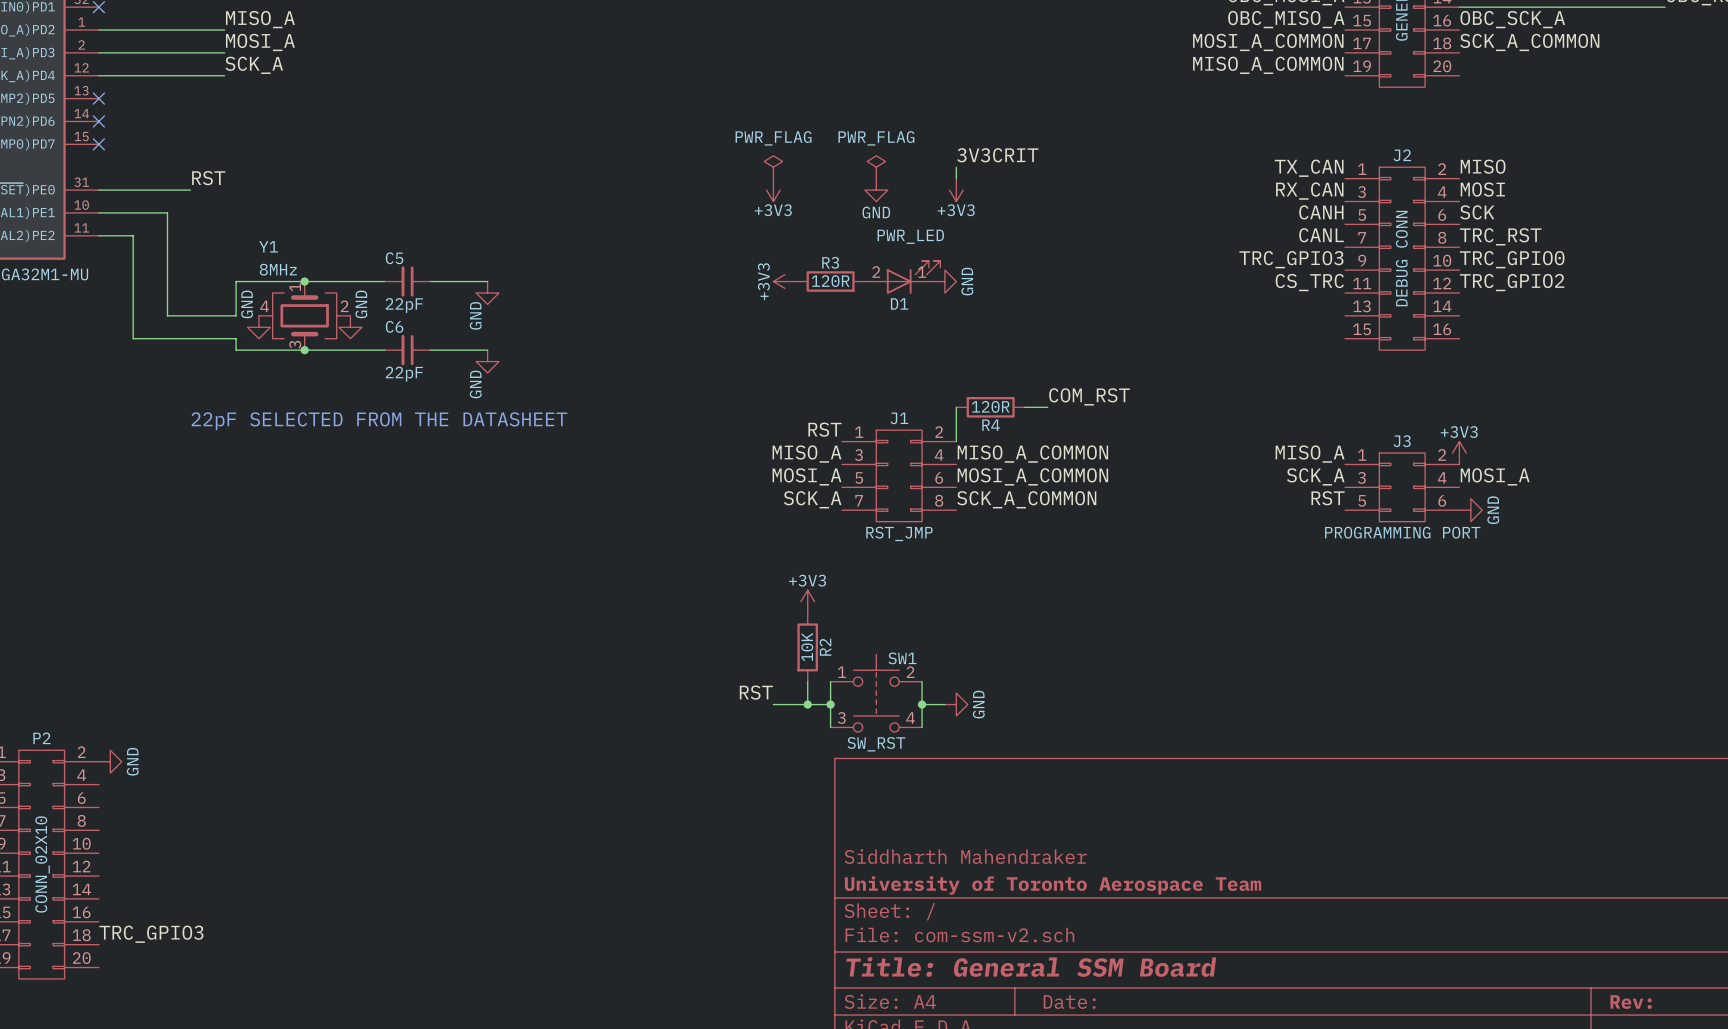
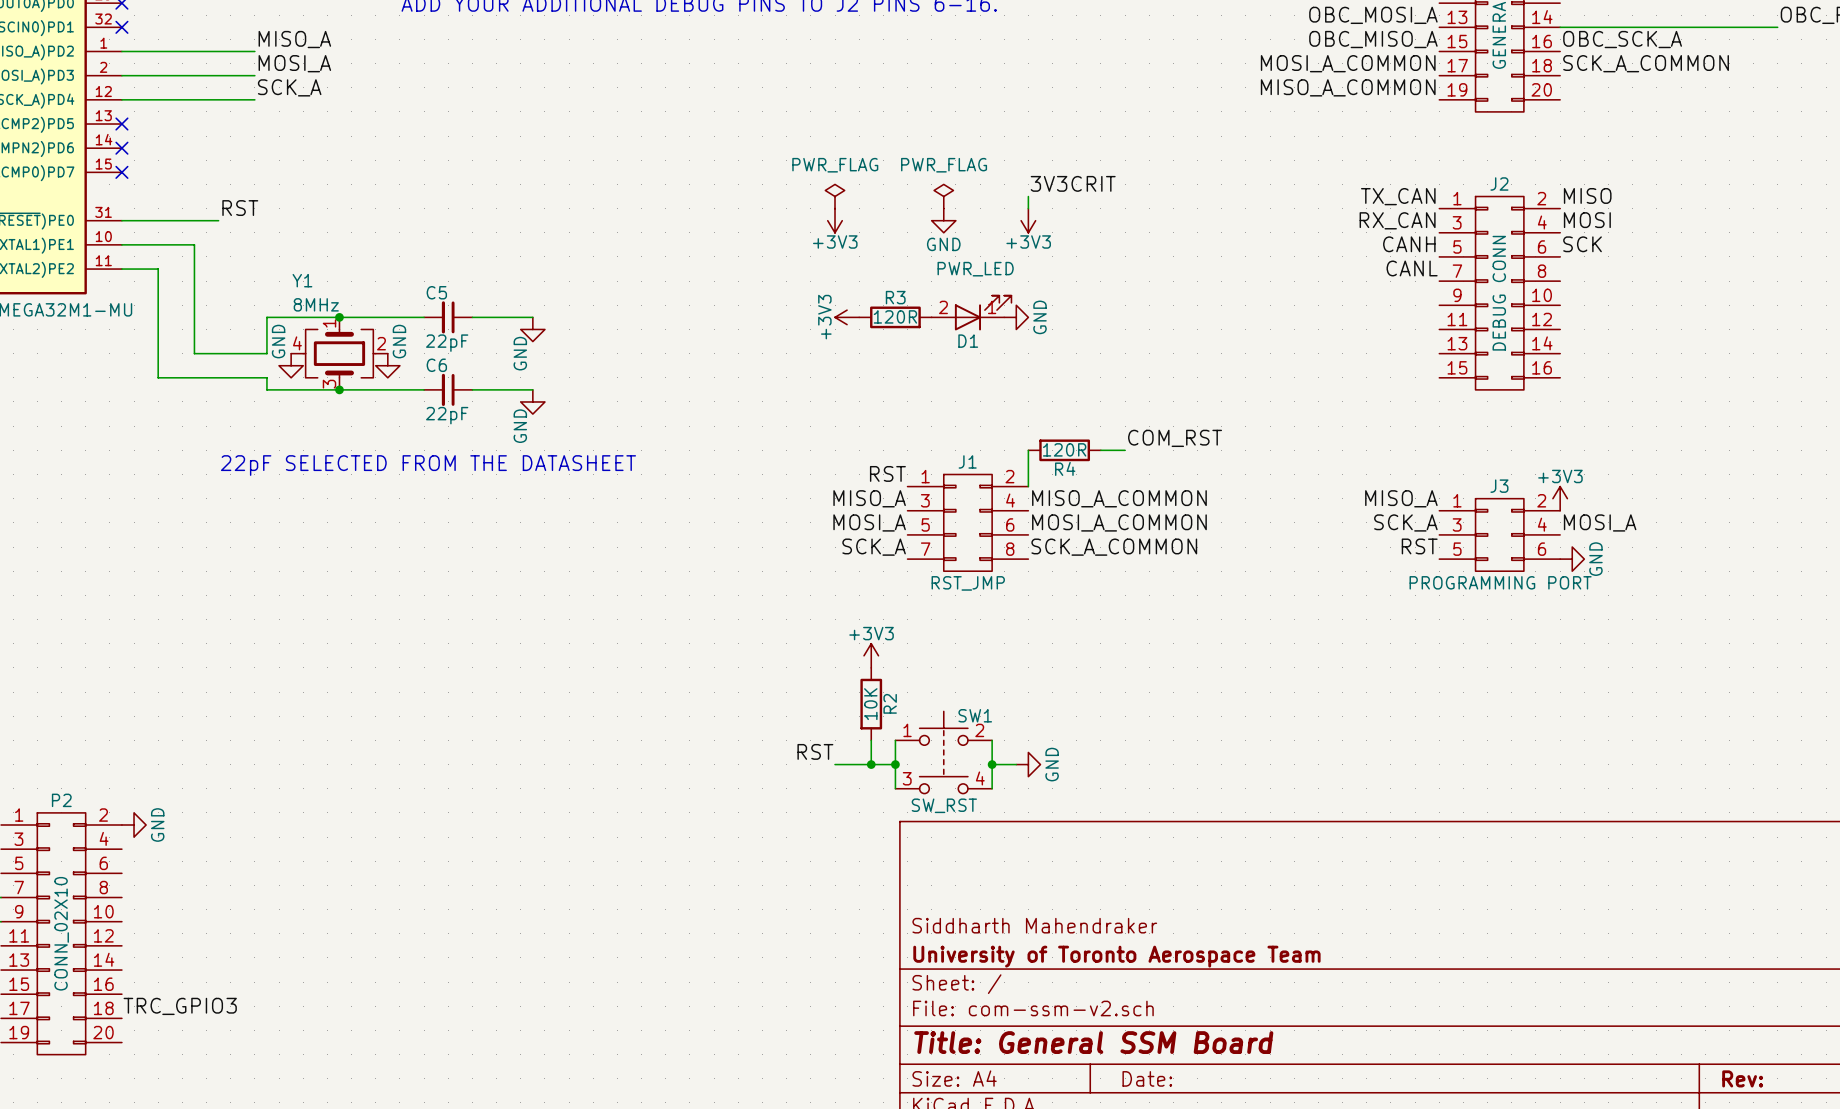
label: TRC_RST (1500, 236) -> none
label: TRC_GPIO3 (1291, 259) -> none
label: TRC_GPIO0 (1512, 259) -> none
label: CS_TRC (1309, 282) -> none
label: TRC_GPIO2 (1512, 282) -> none

